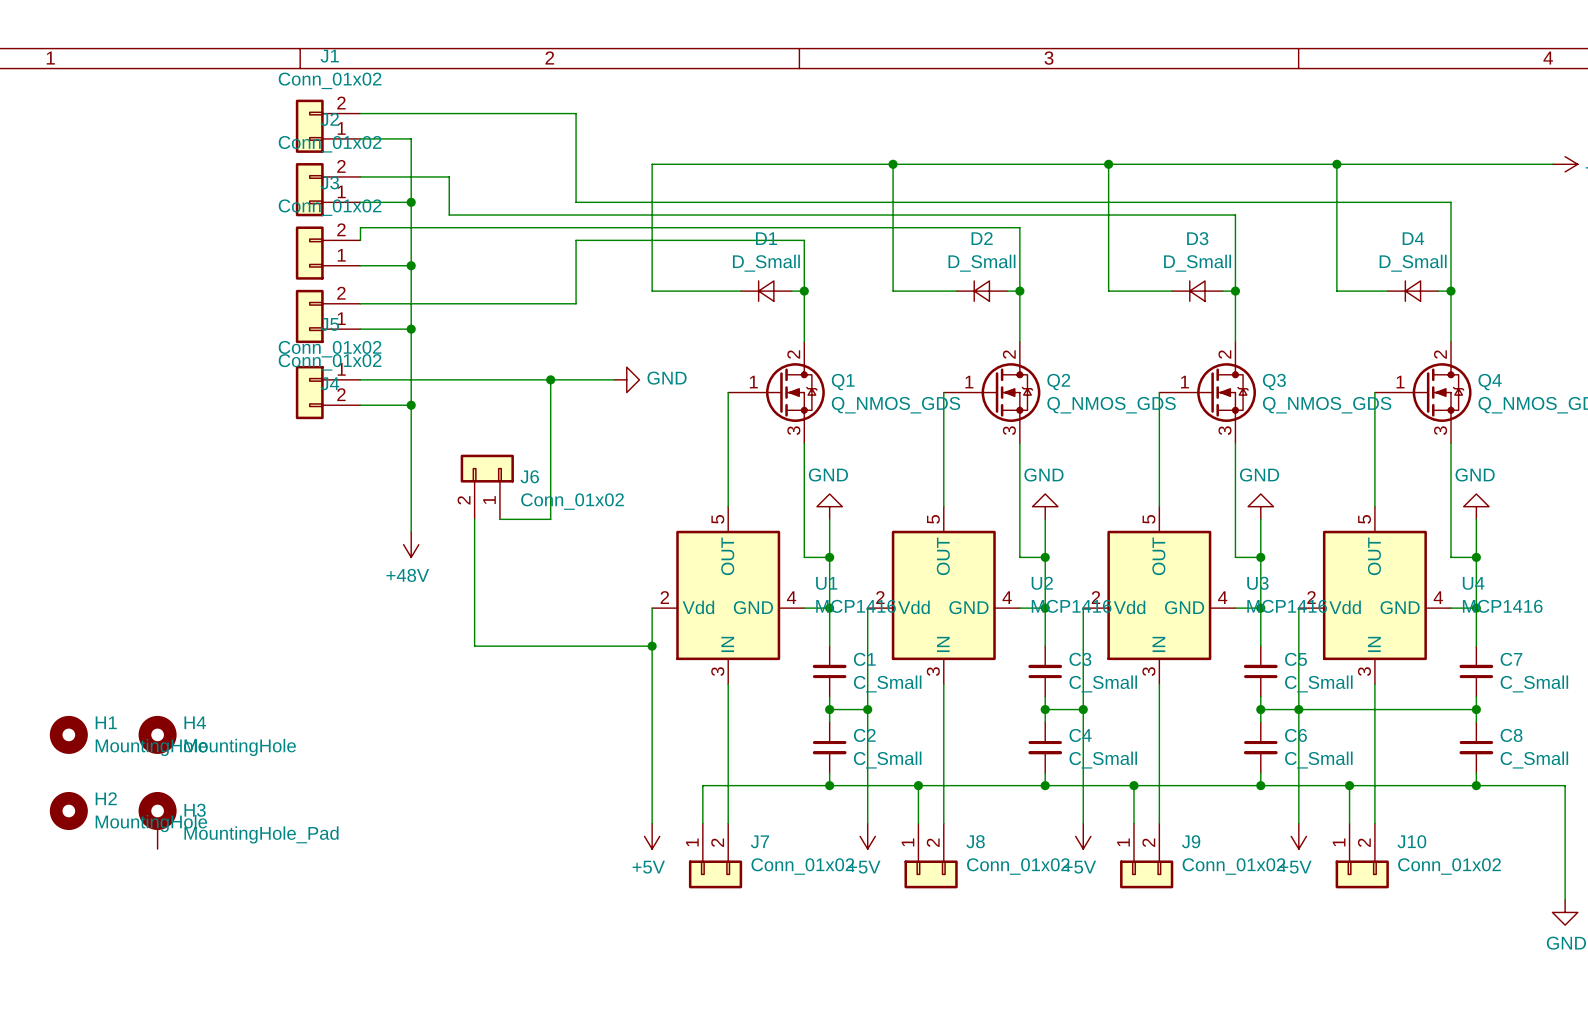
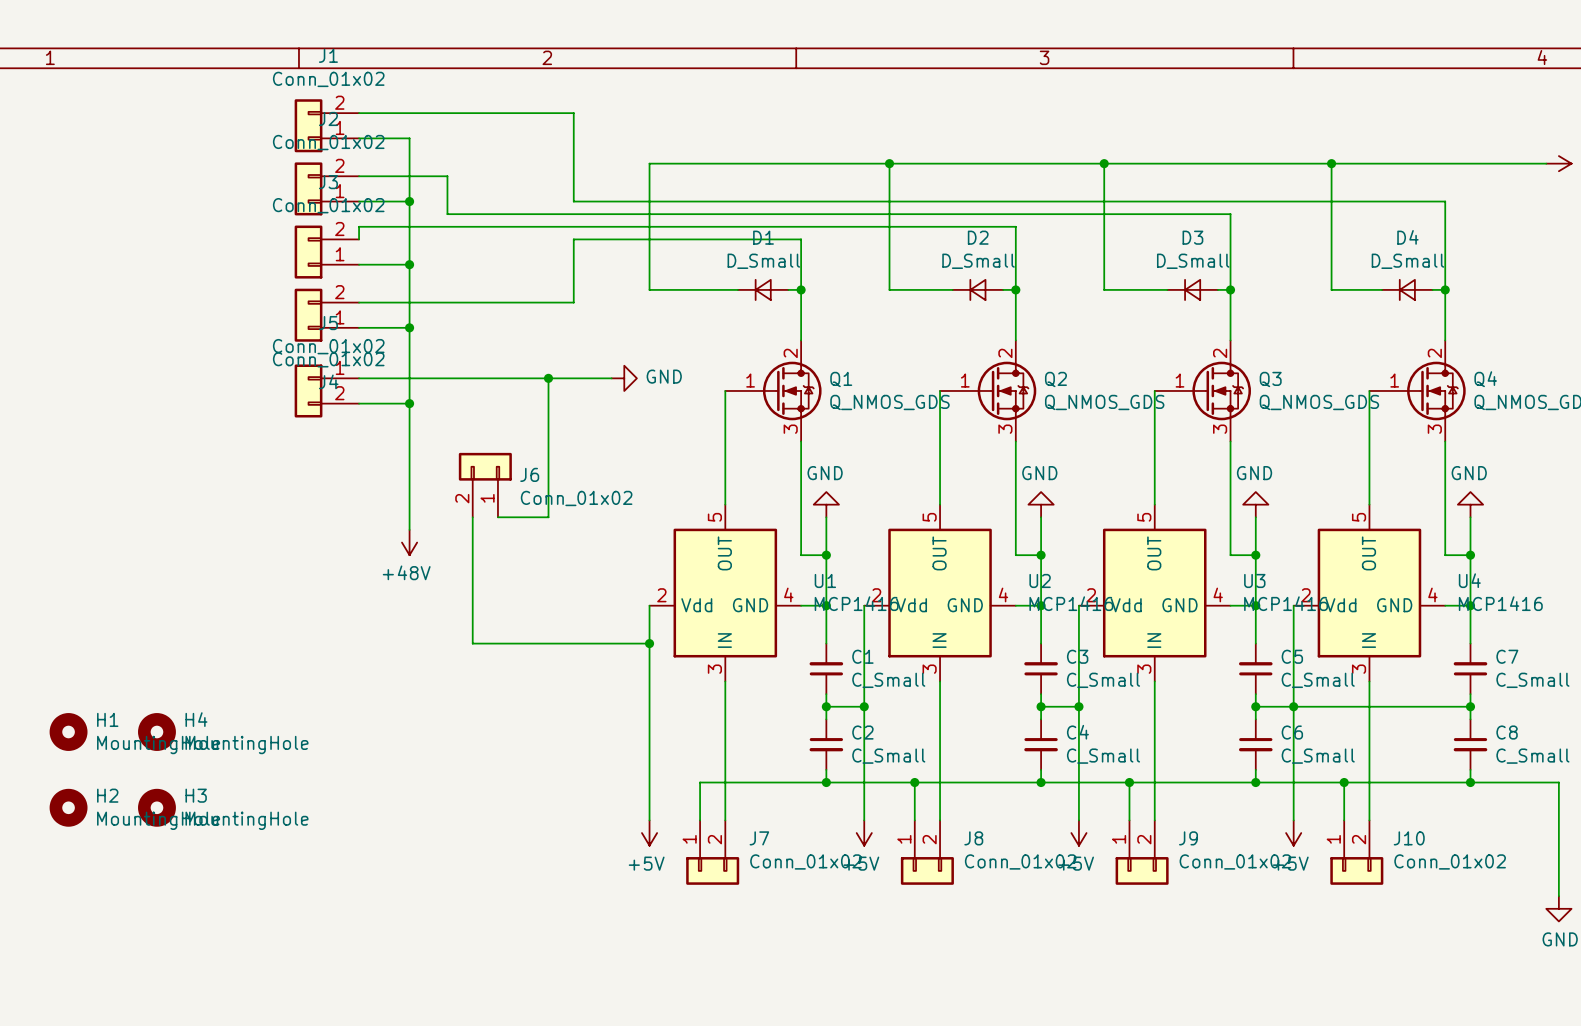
H3 symbol: [138, 791, 177, 850] -> [138, 788, 176, 827]
H3 value: MountingHole_Pad (261, 834) -> MountingHole (246, 820)

